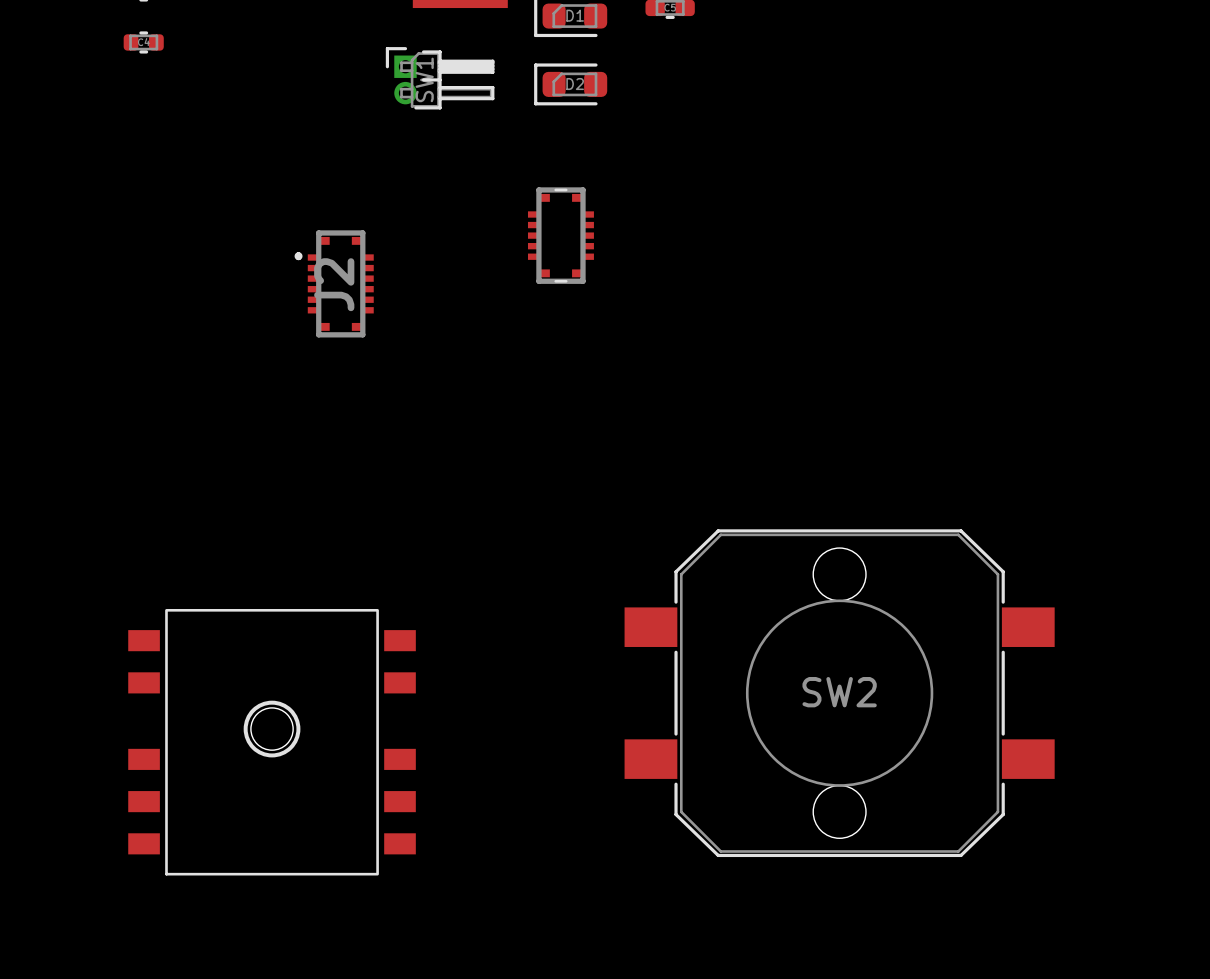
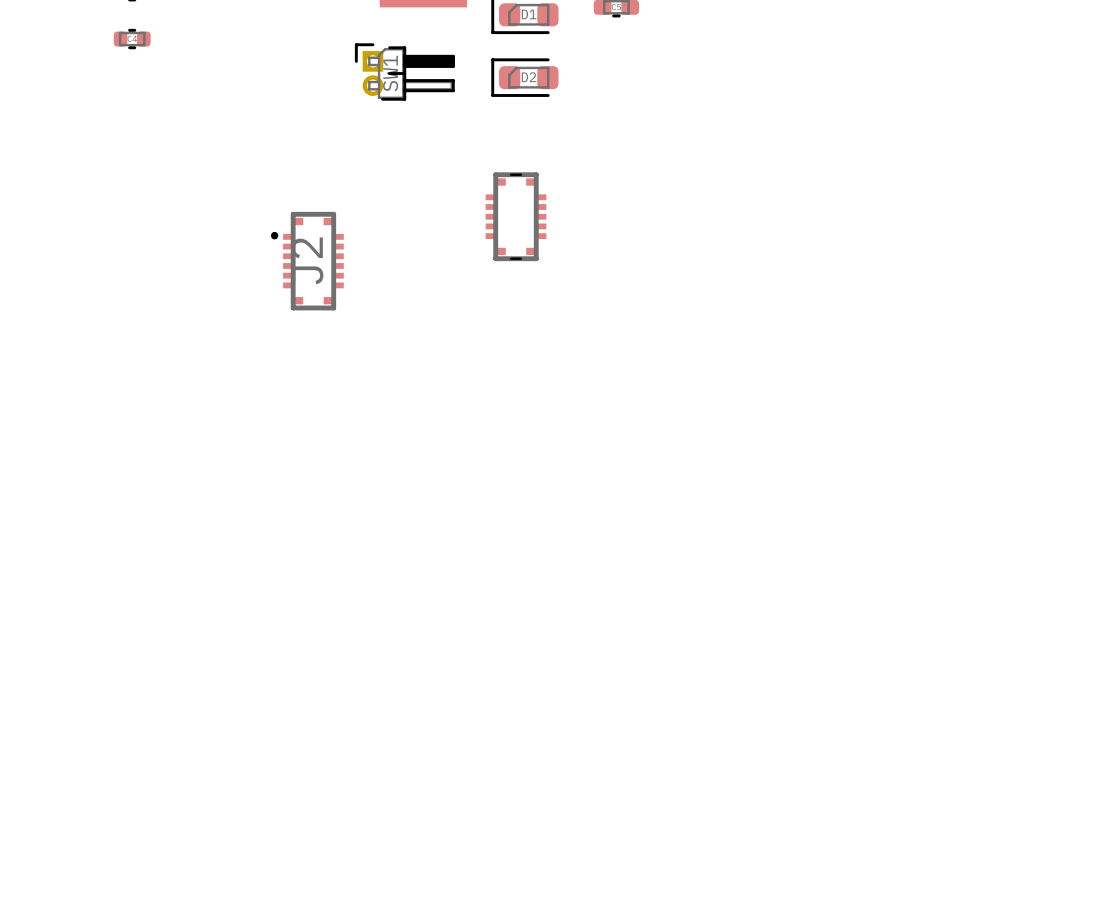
SW2: (839, 693) -> none
part: (272, 742) -> none

